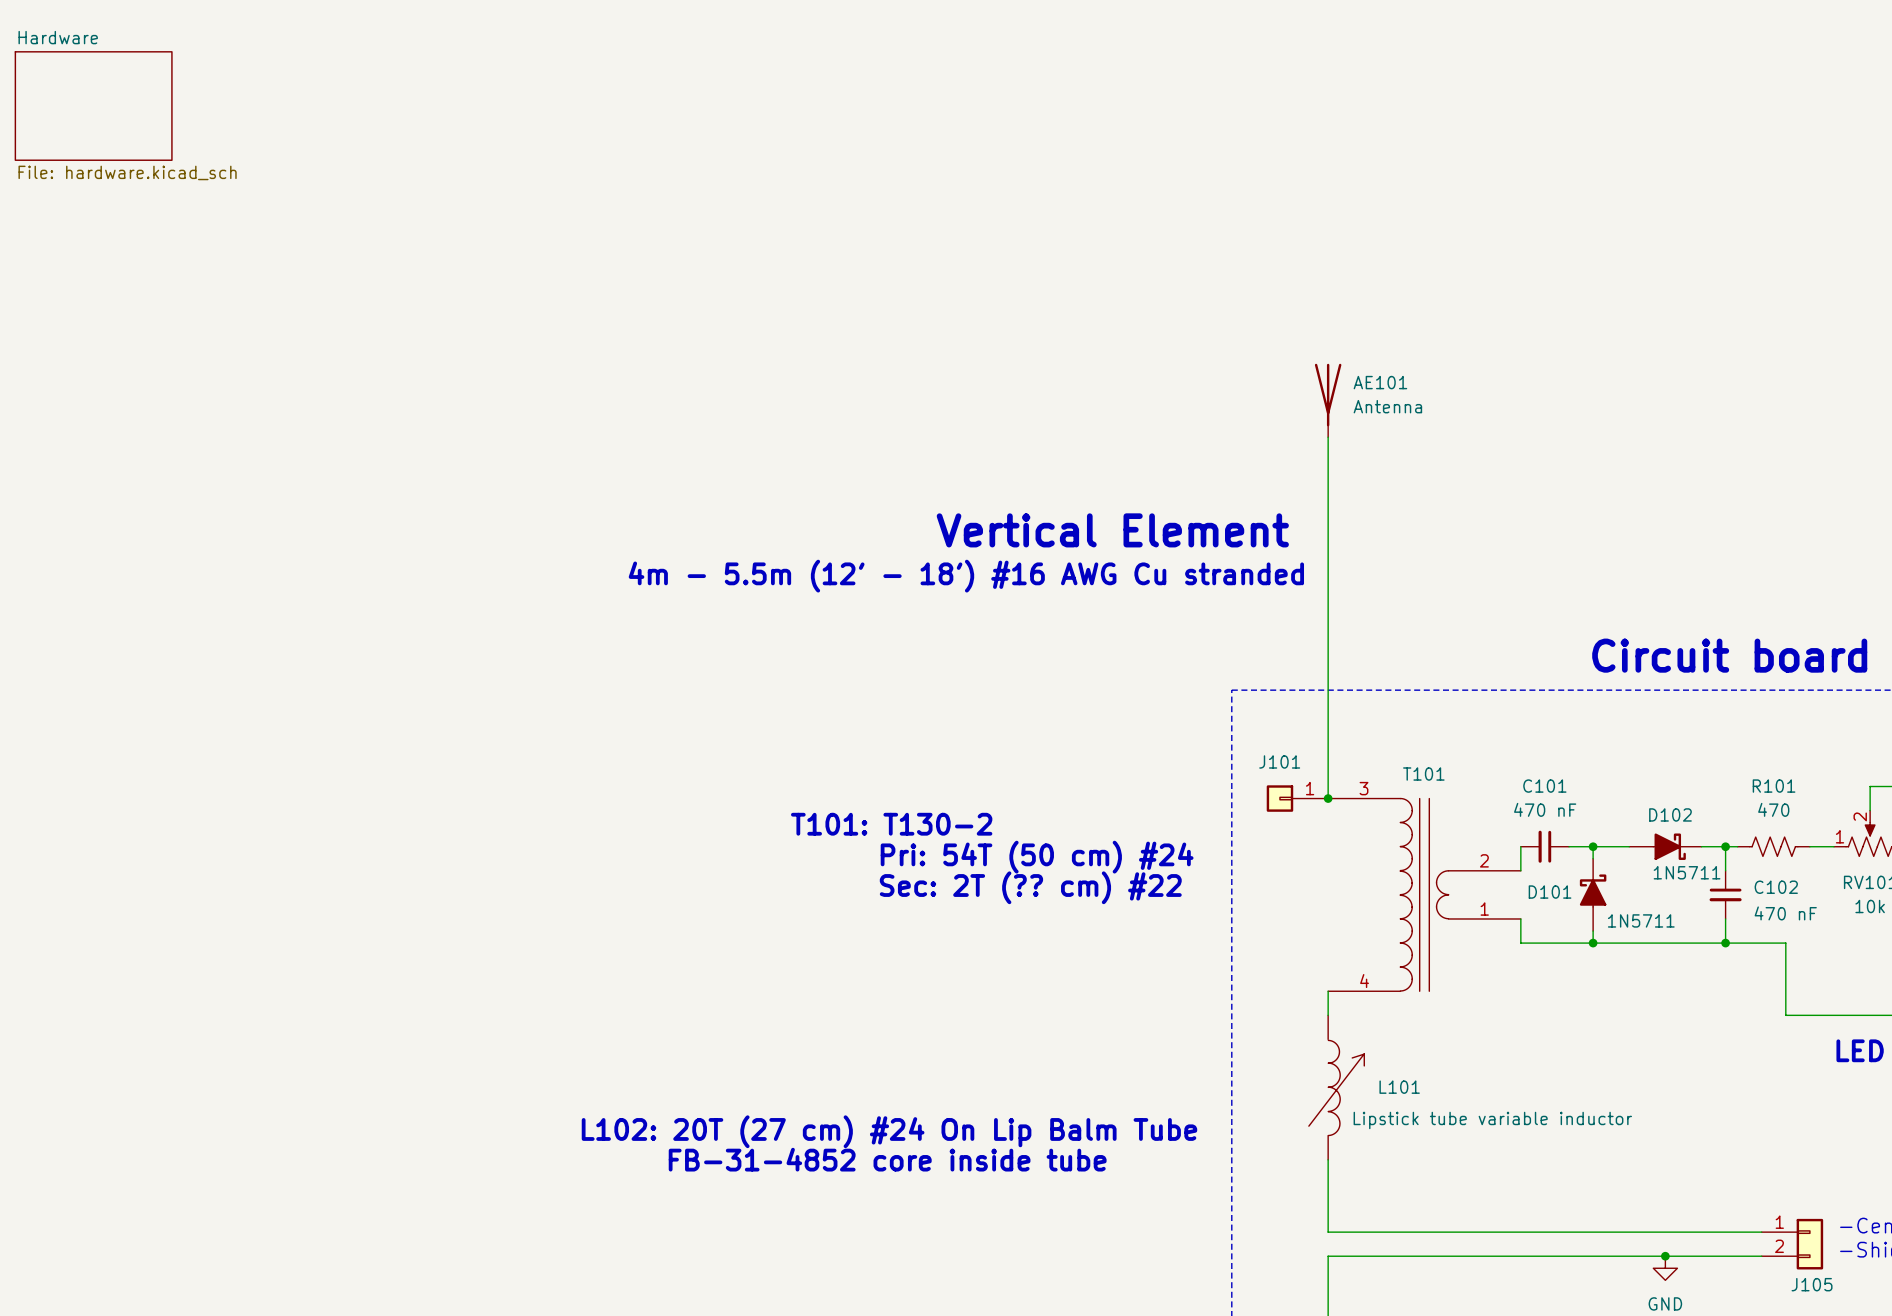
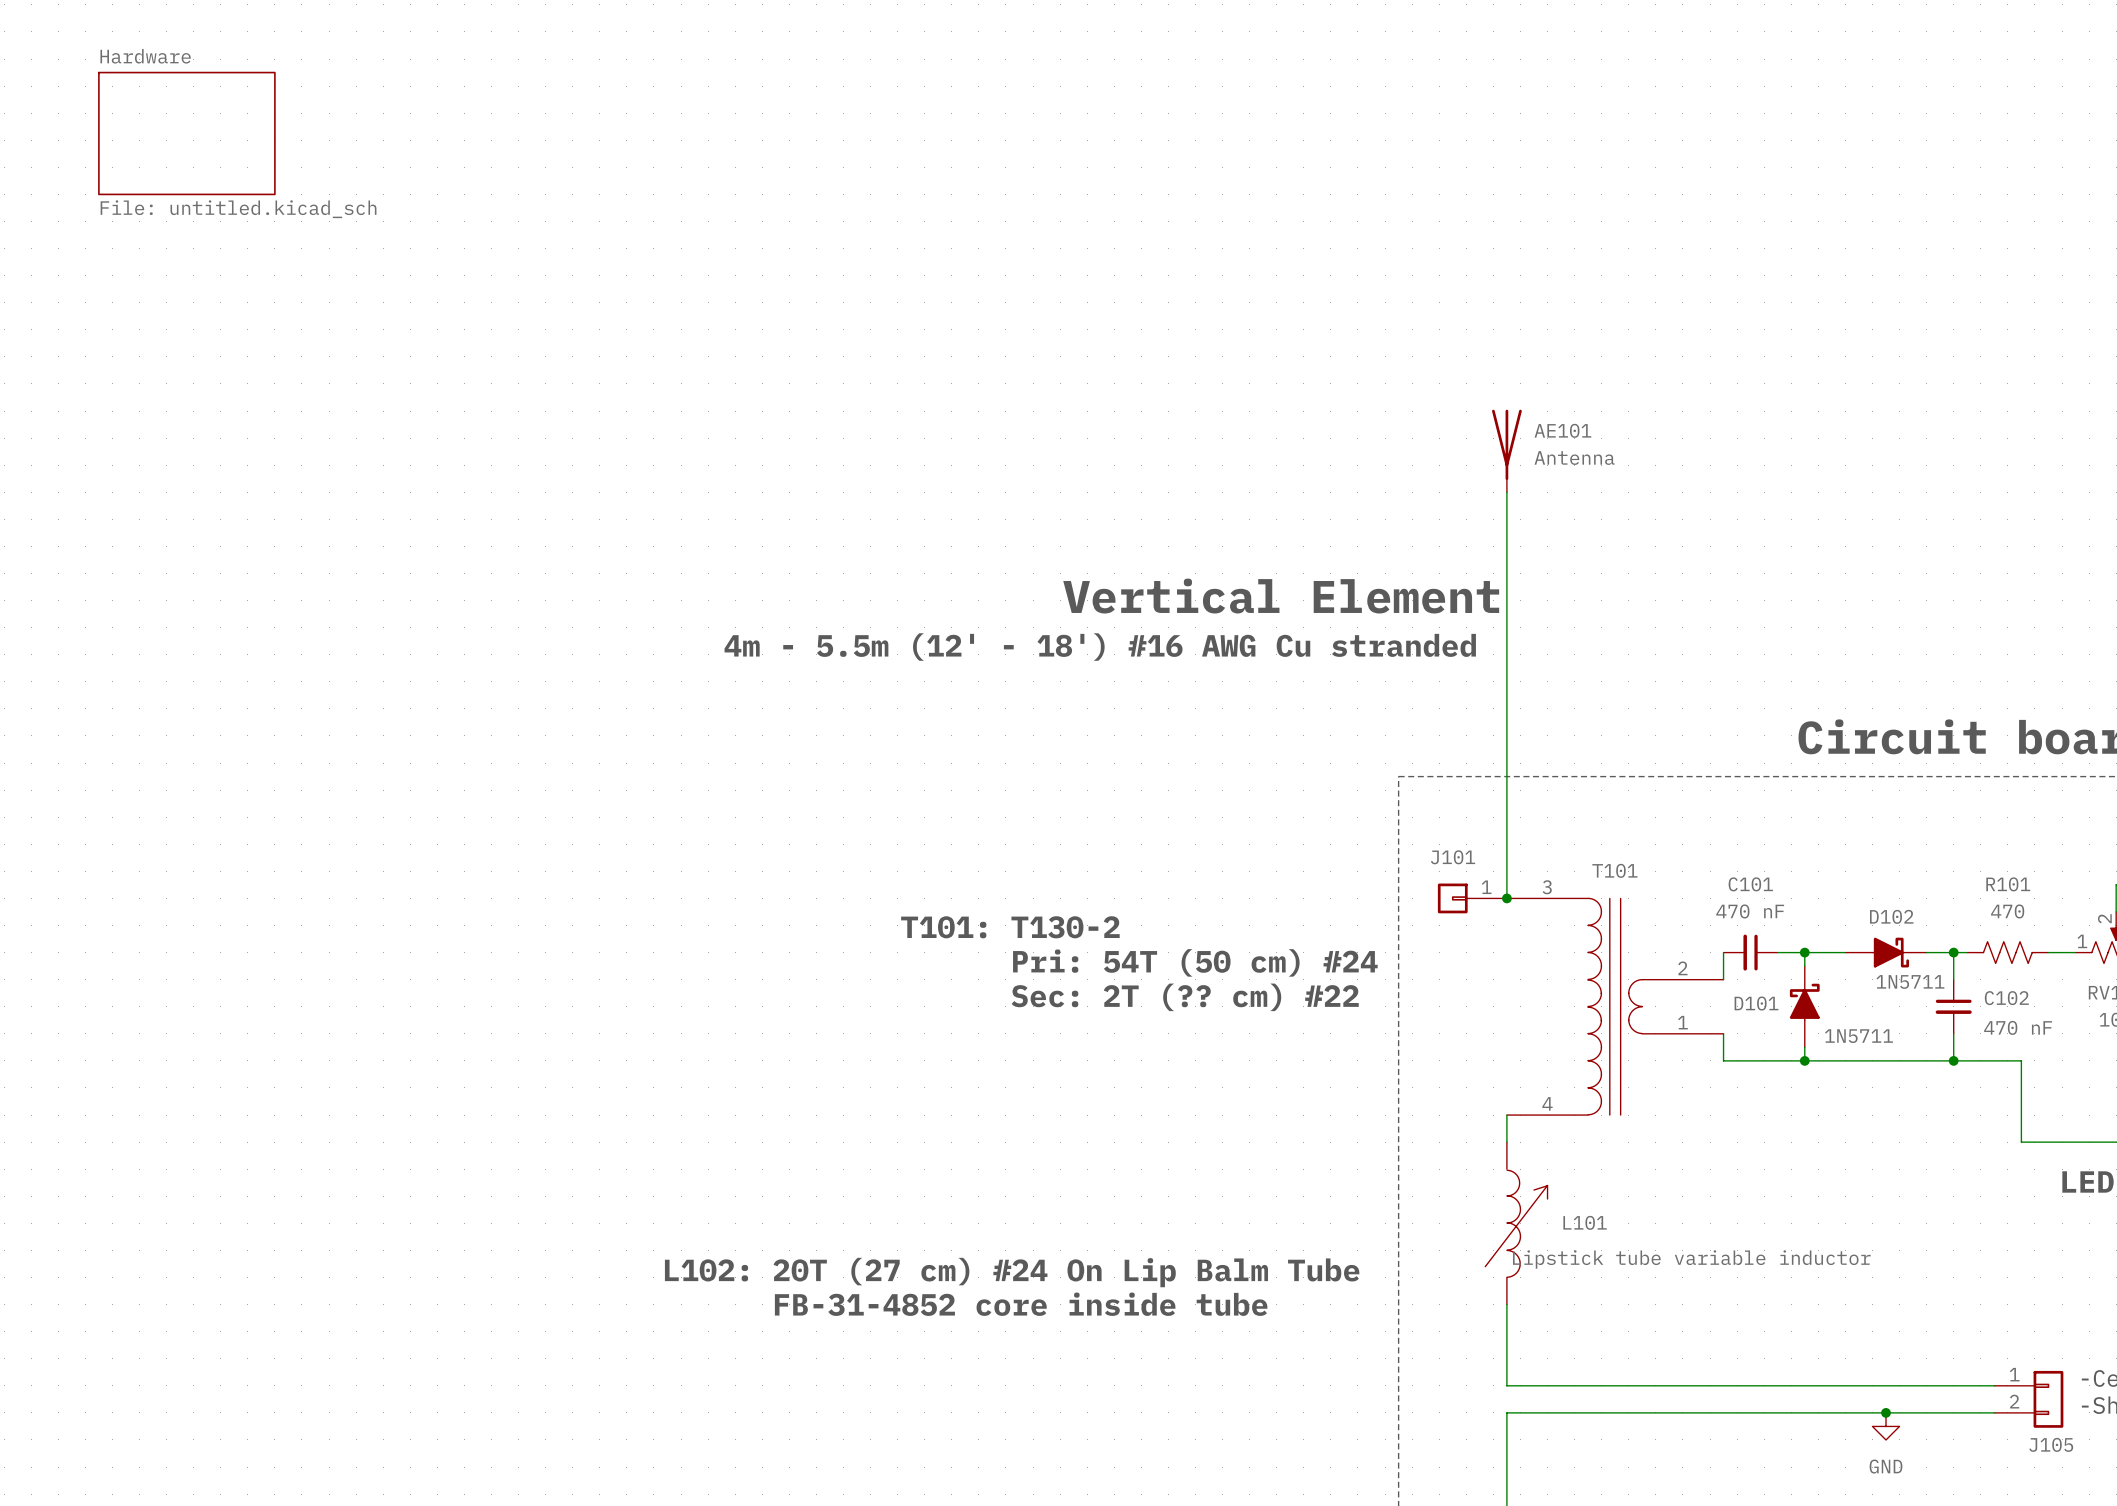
sheet Hardware: File: hardware.kicad_sch (93, 106) -> none
sheet Hardware: none -> File: untitled.kicad_sch (186, 133)

